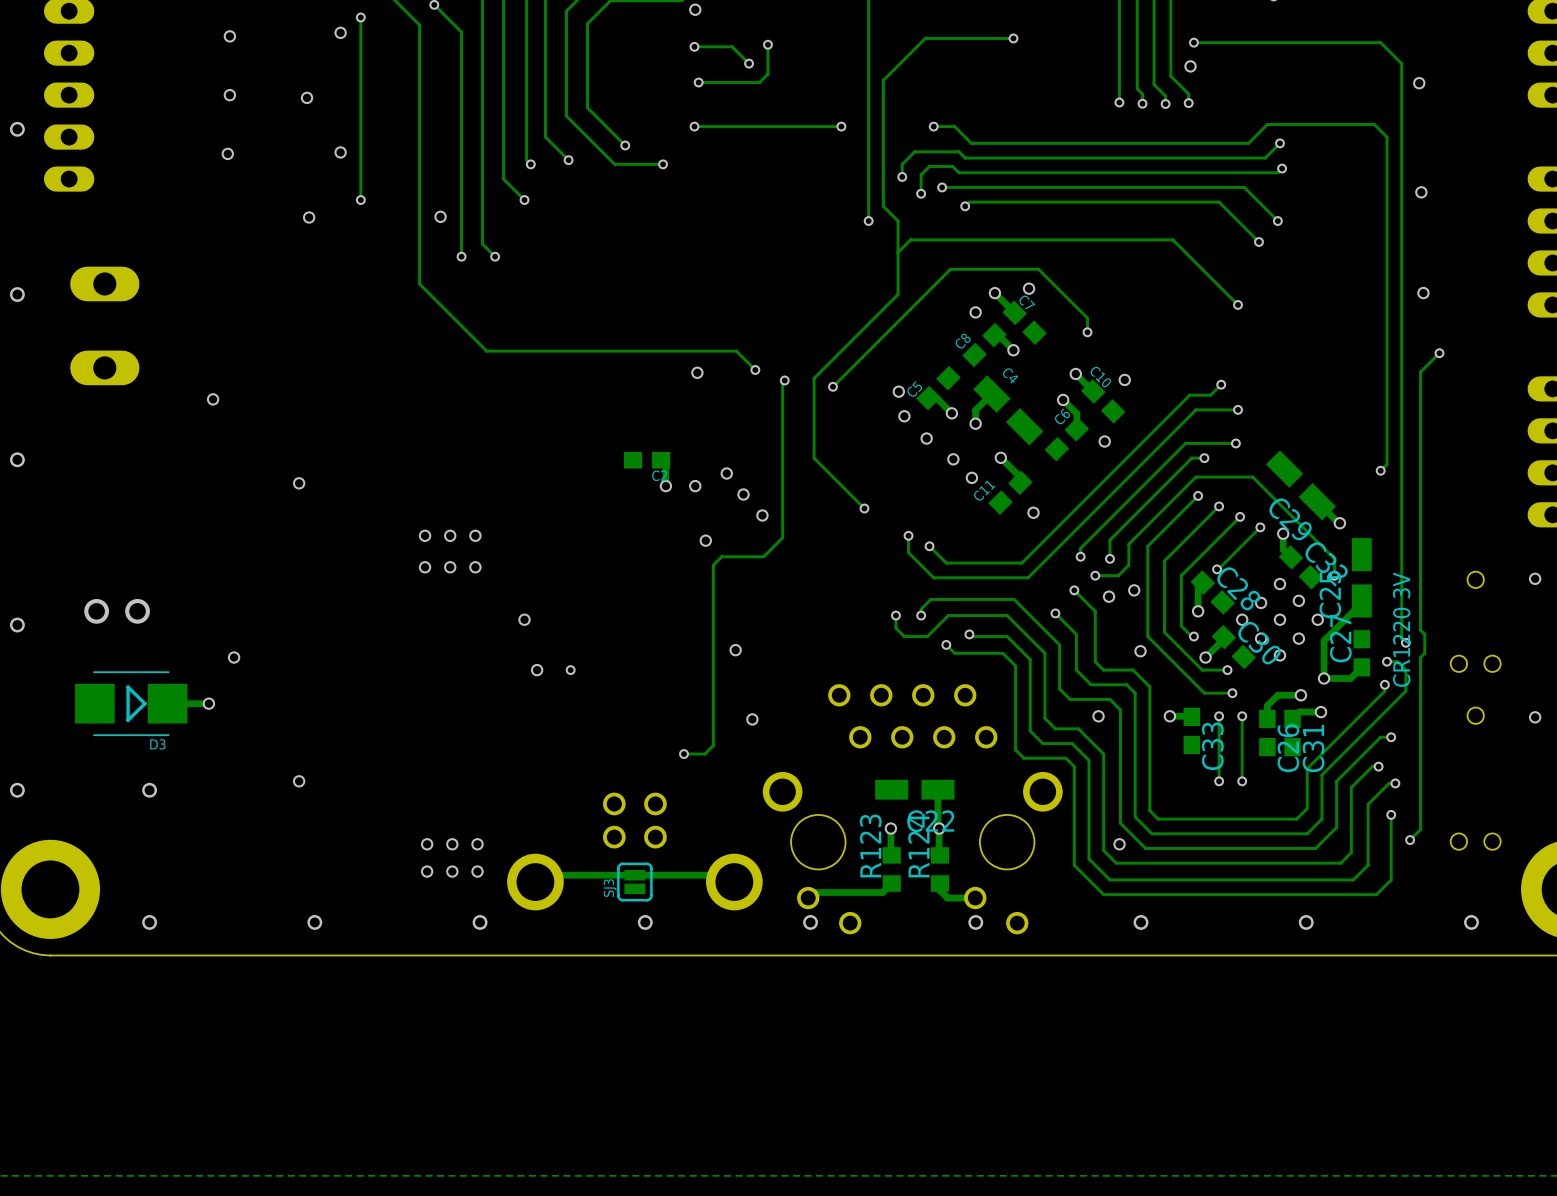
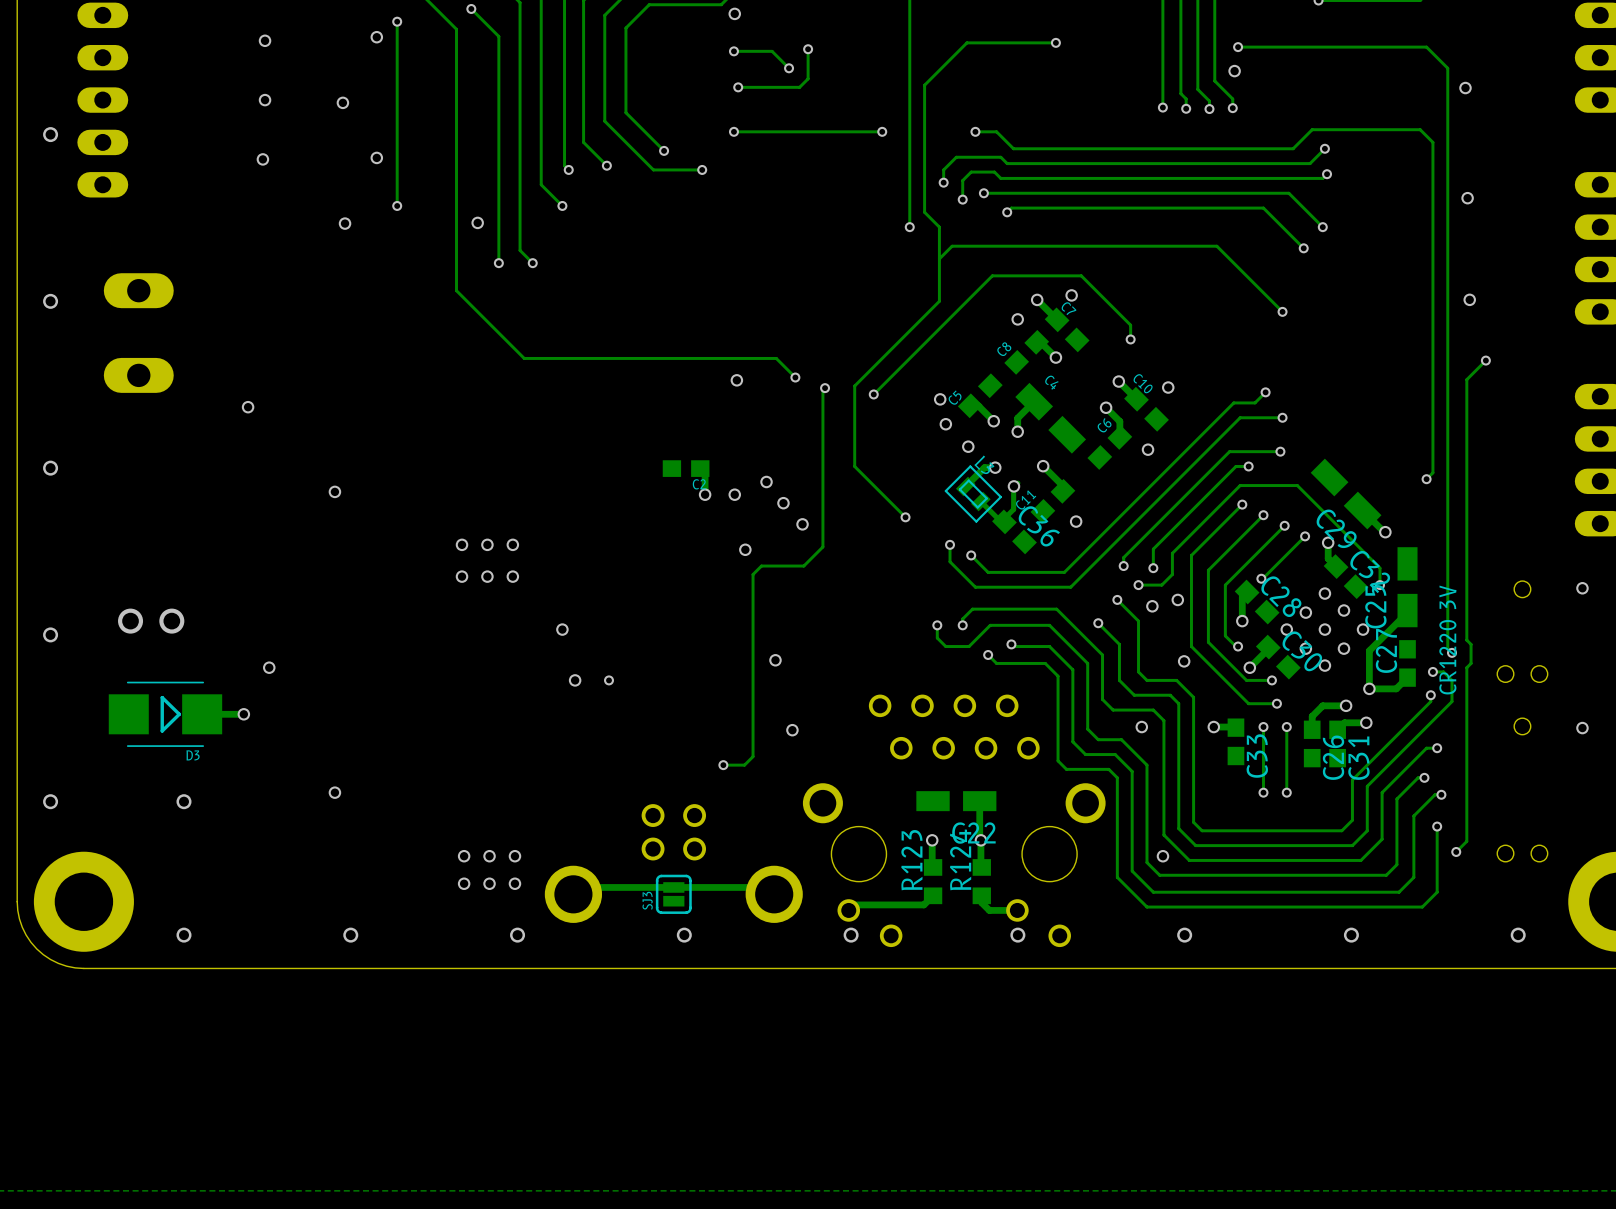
track: none -> (995, 467) (984, 467) (965, 486)
track: none -> (1017, 483) (1013, 487) (1013, 509) (1001, 521)
L3: none -> (973, 494)
track: none -> (980, 501) (1001, 521)
C36: none -> (1014, 531)

